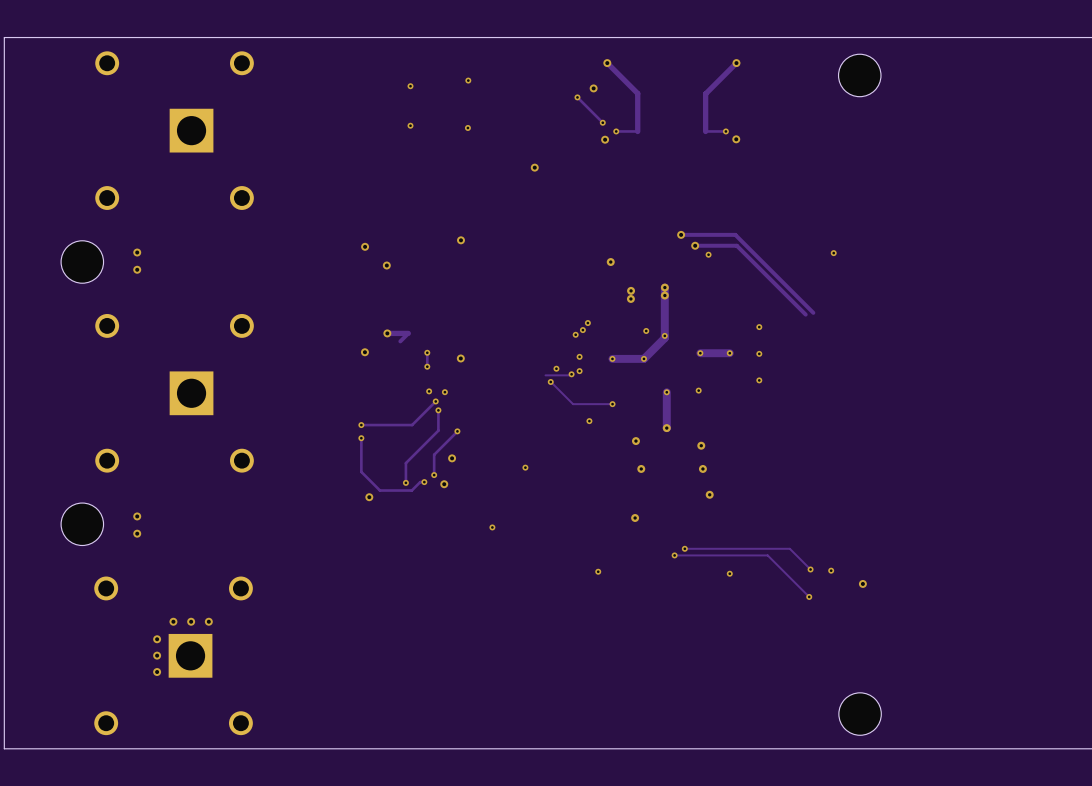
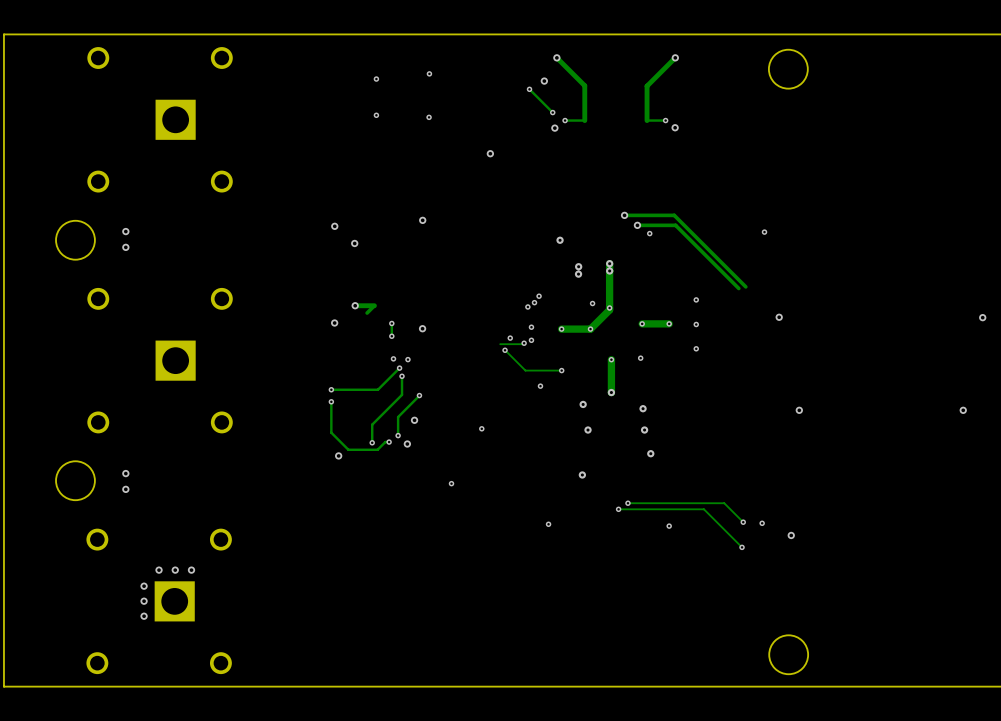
via: none -> (779, 317)
via: none -> (982, 317)
via: none -> (799, 410)
via: none -> (963, 410)

